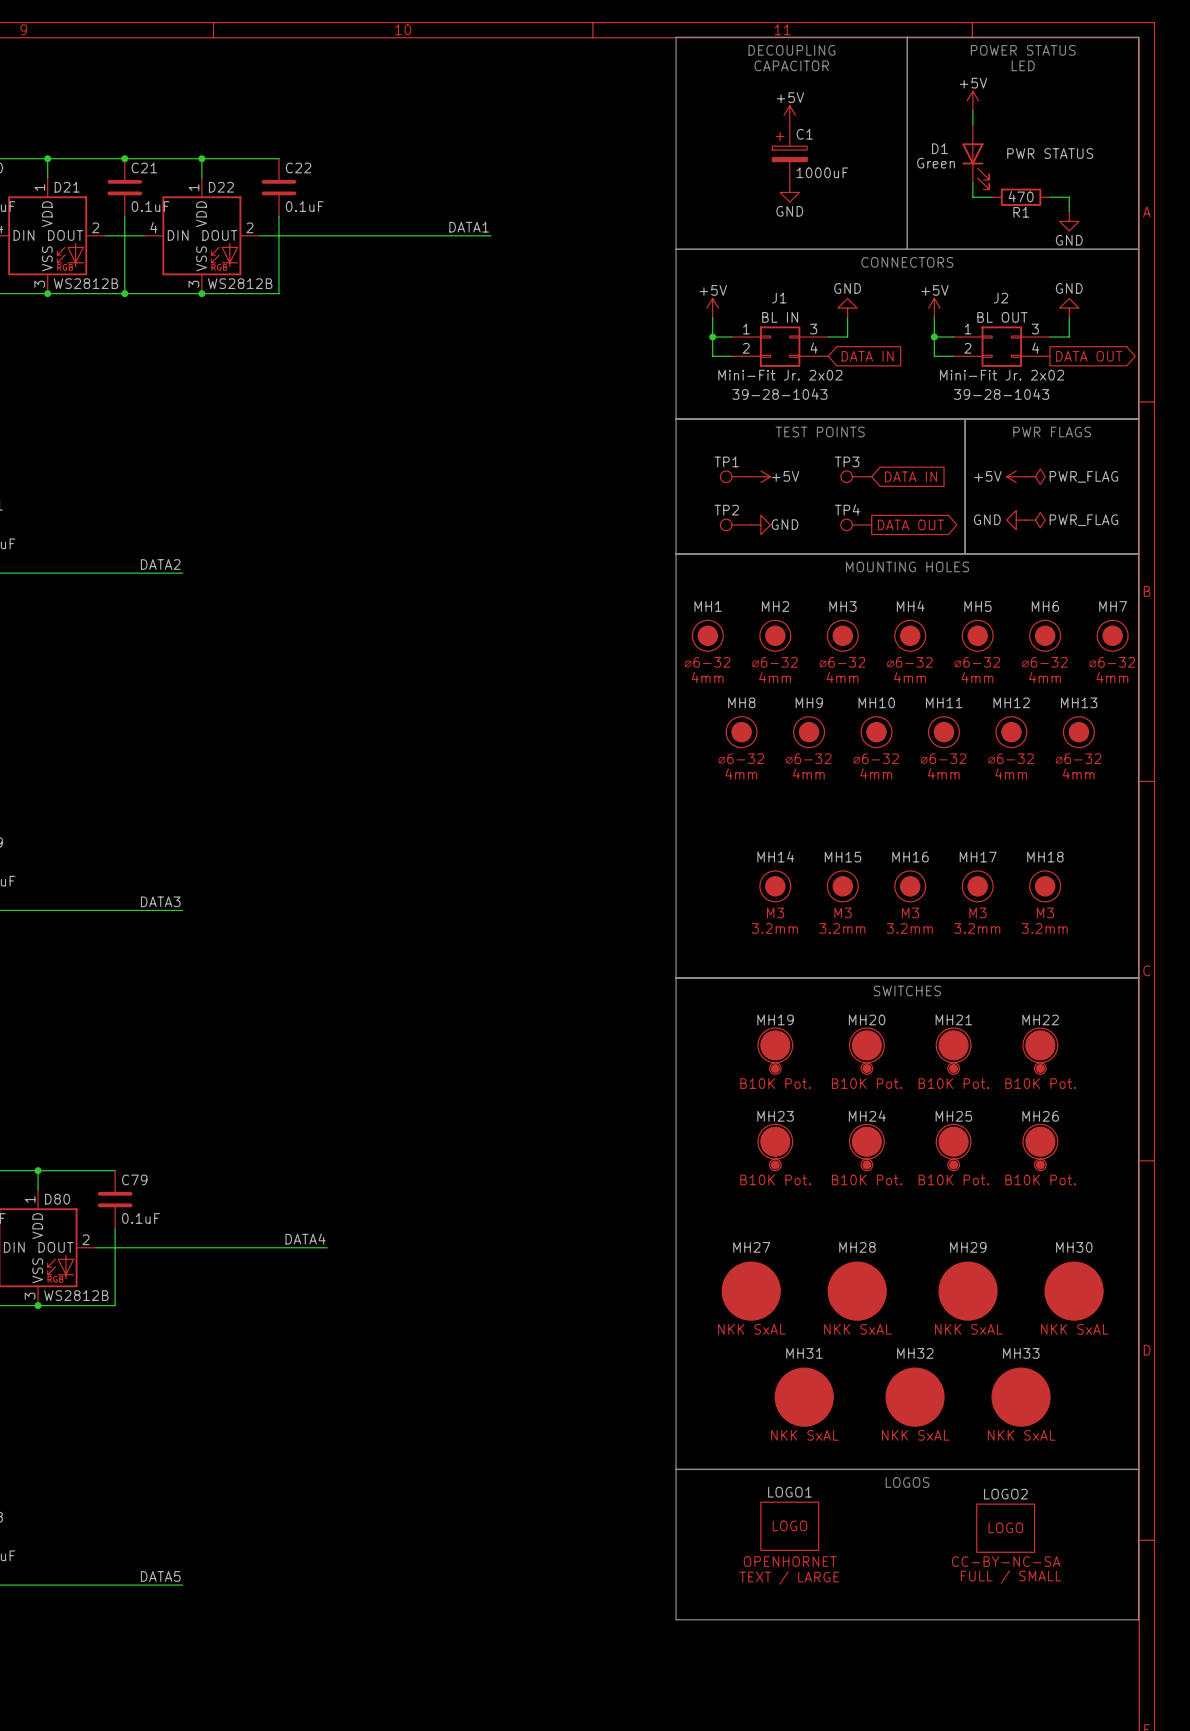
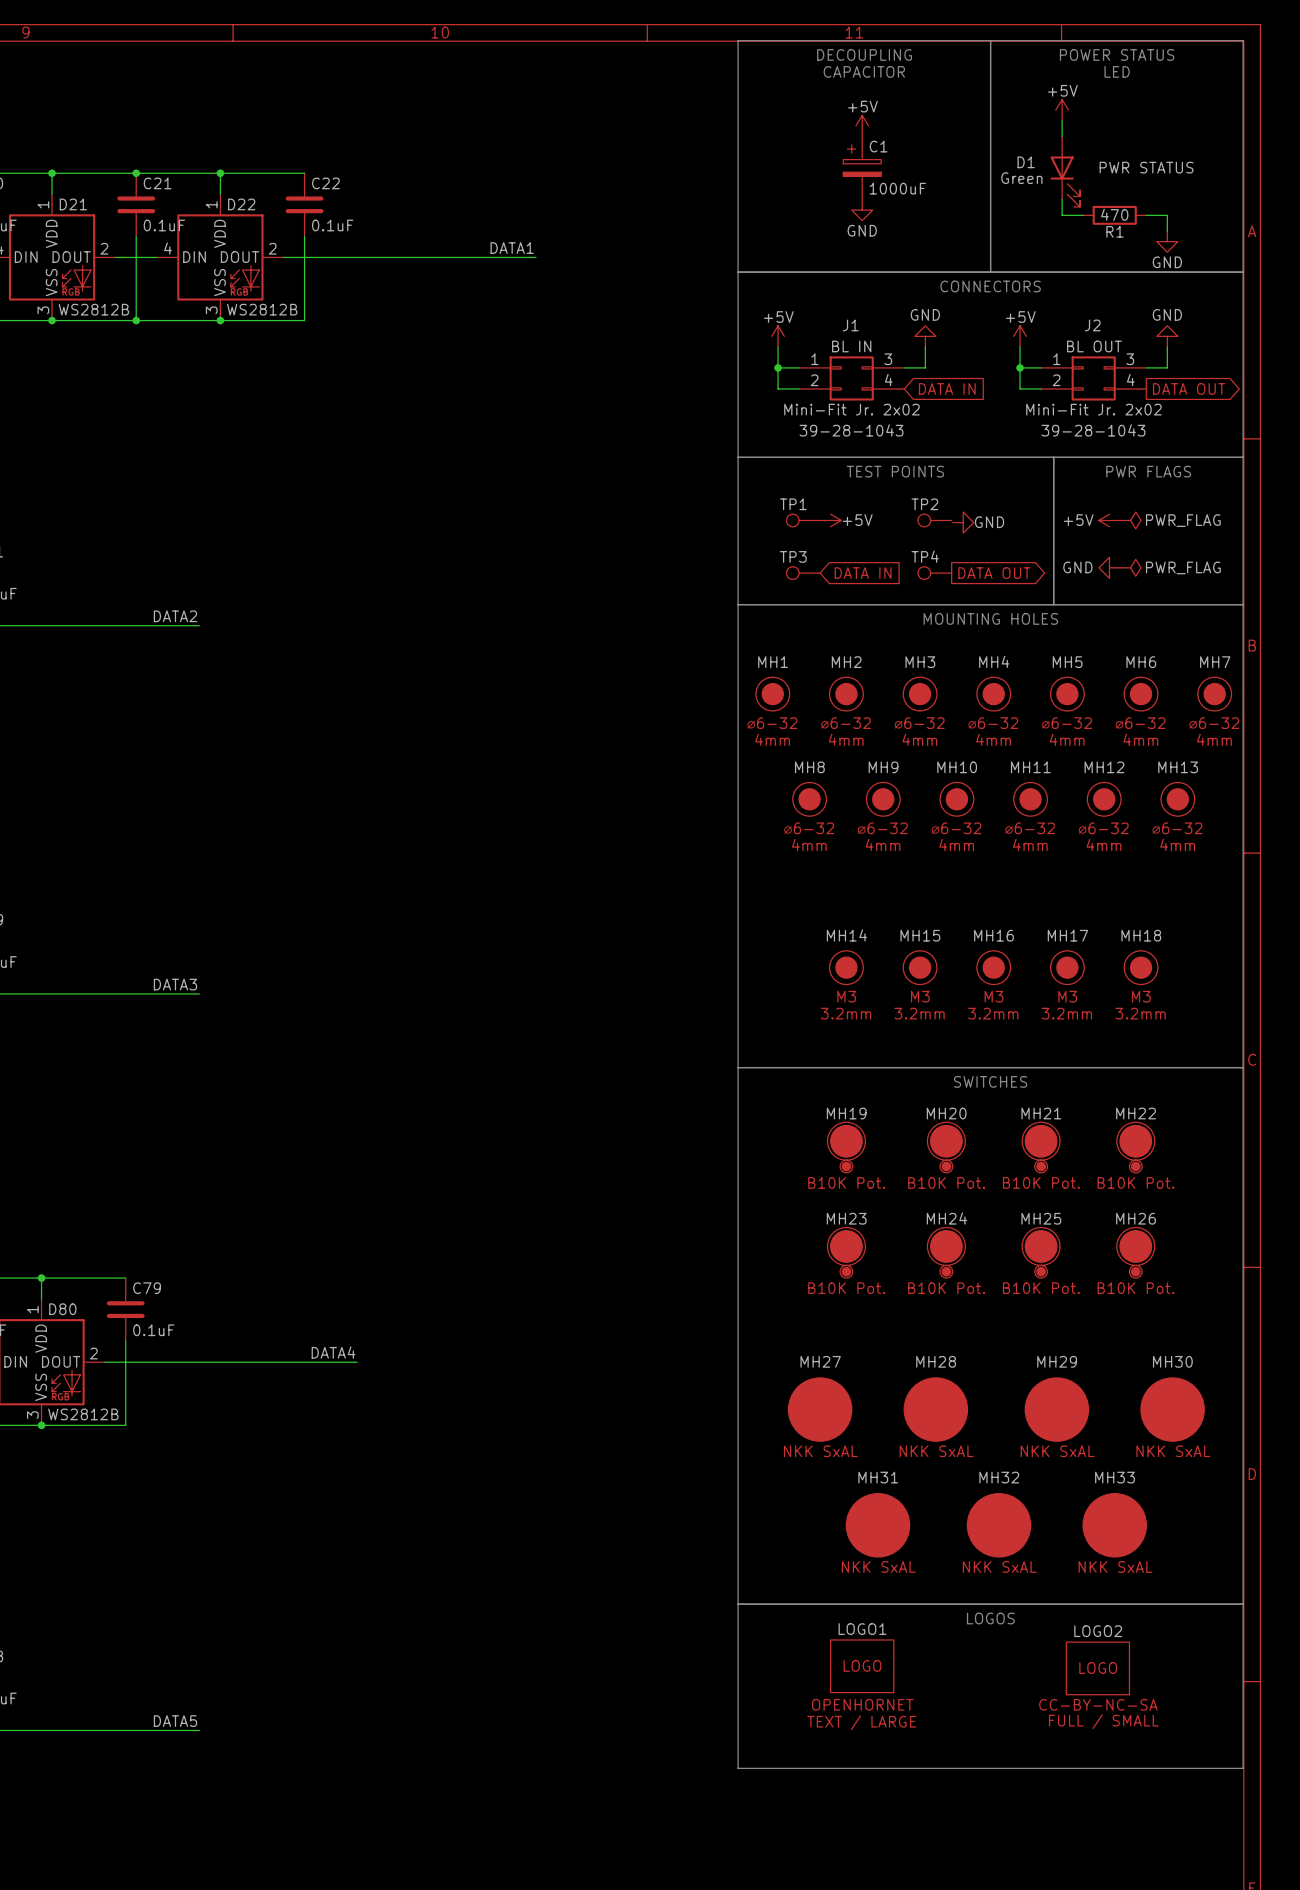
TP3 name: TP3 (847, 461) -> TP2 (924, 504)
global label position: DATA IN (911, 476) -> DATA IN (863, 573)
TP2 name: TP2 (726, 510) -> TP3 (793, 556)
power symbol position: GND (760, 524) -> GND (963, 522)

